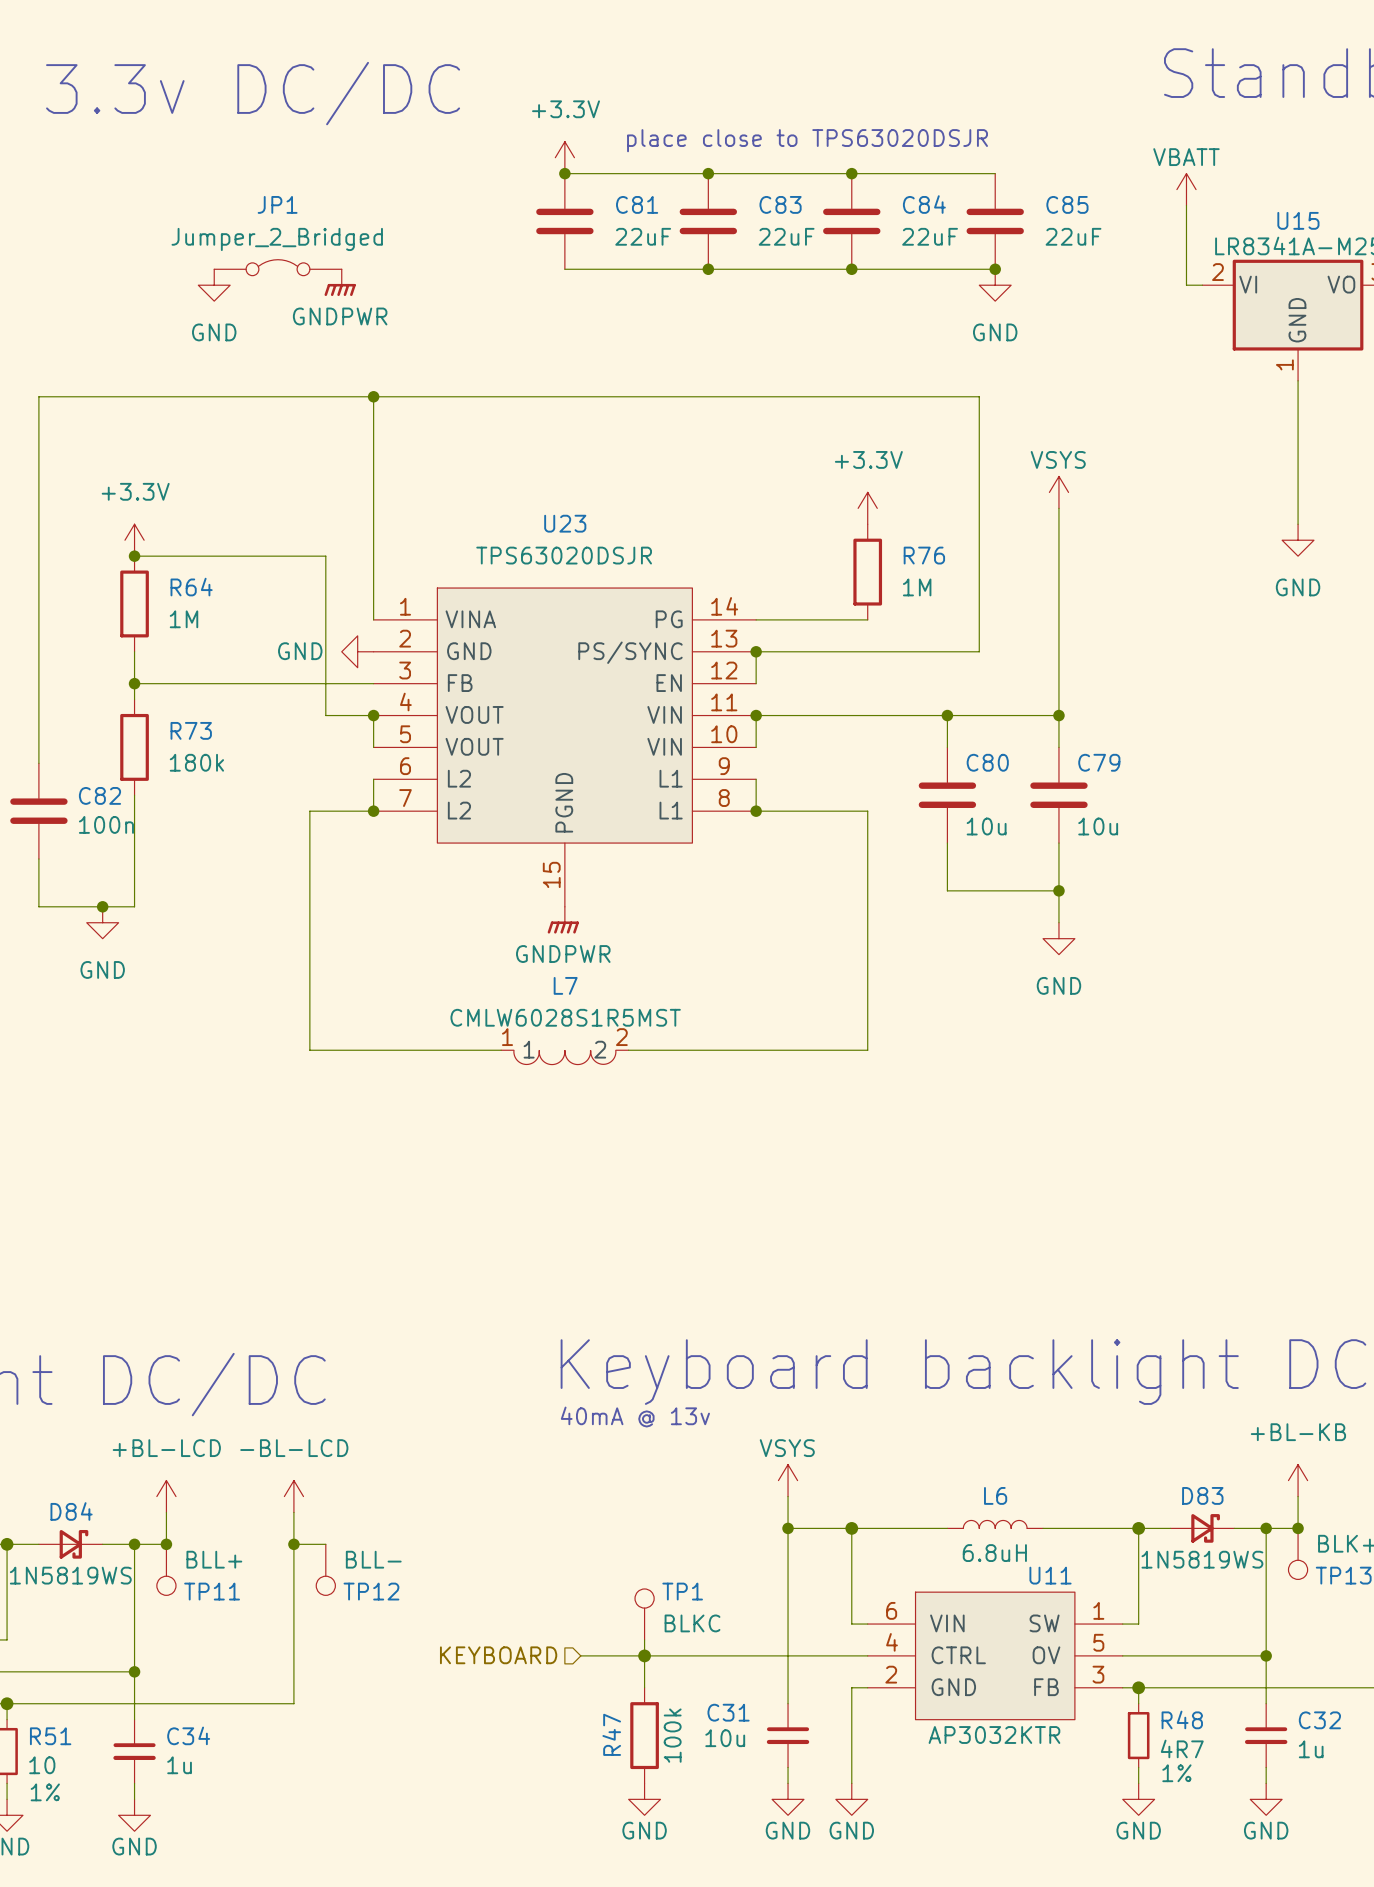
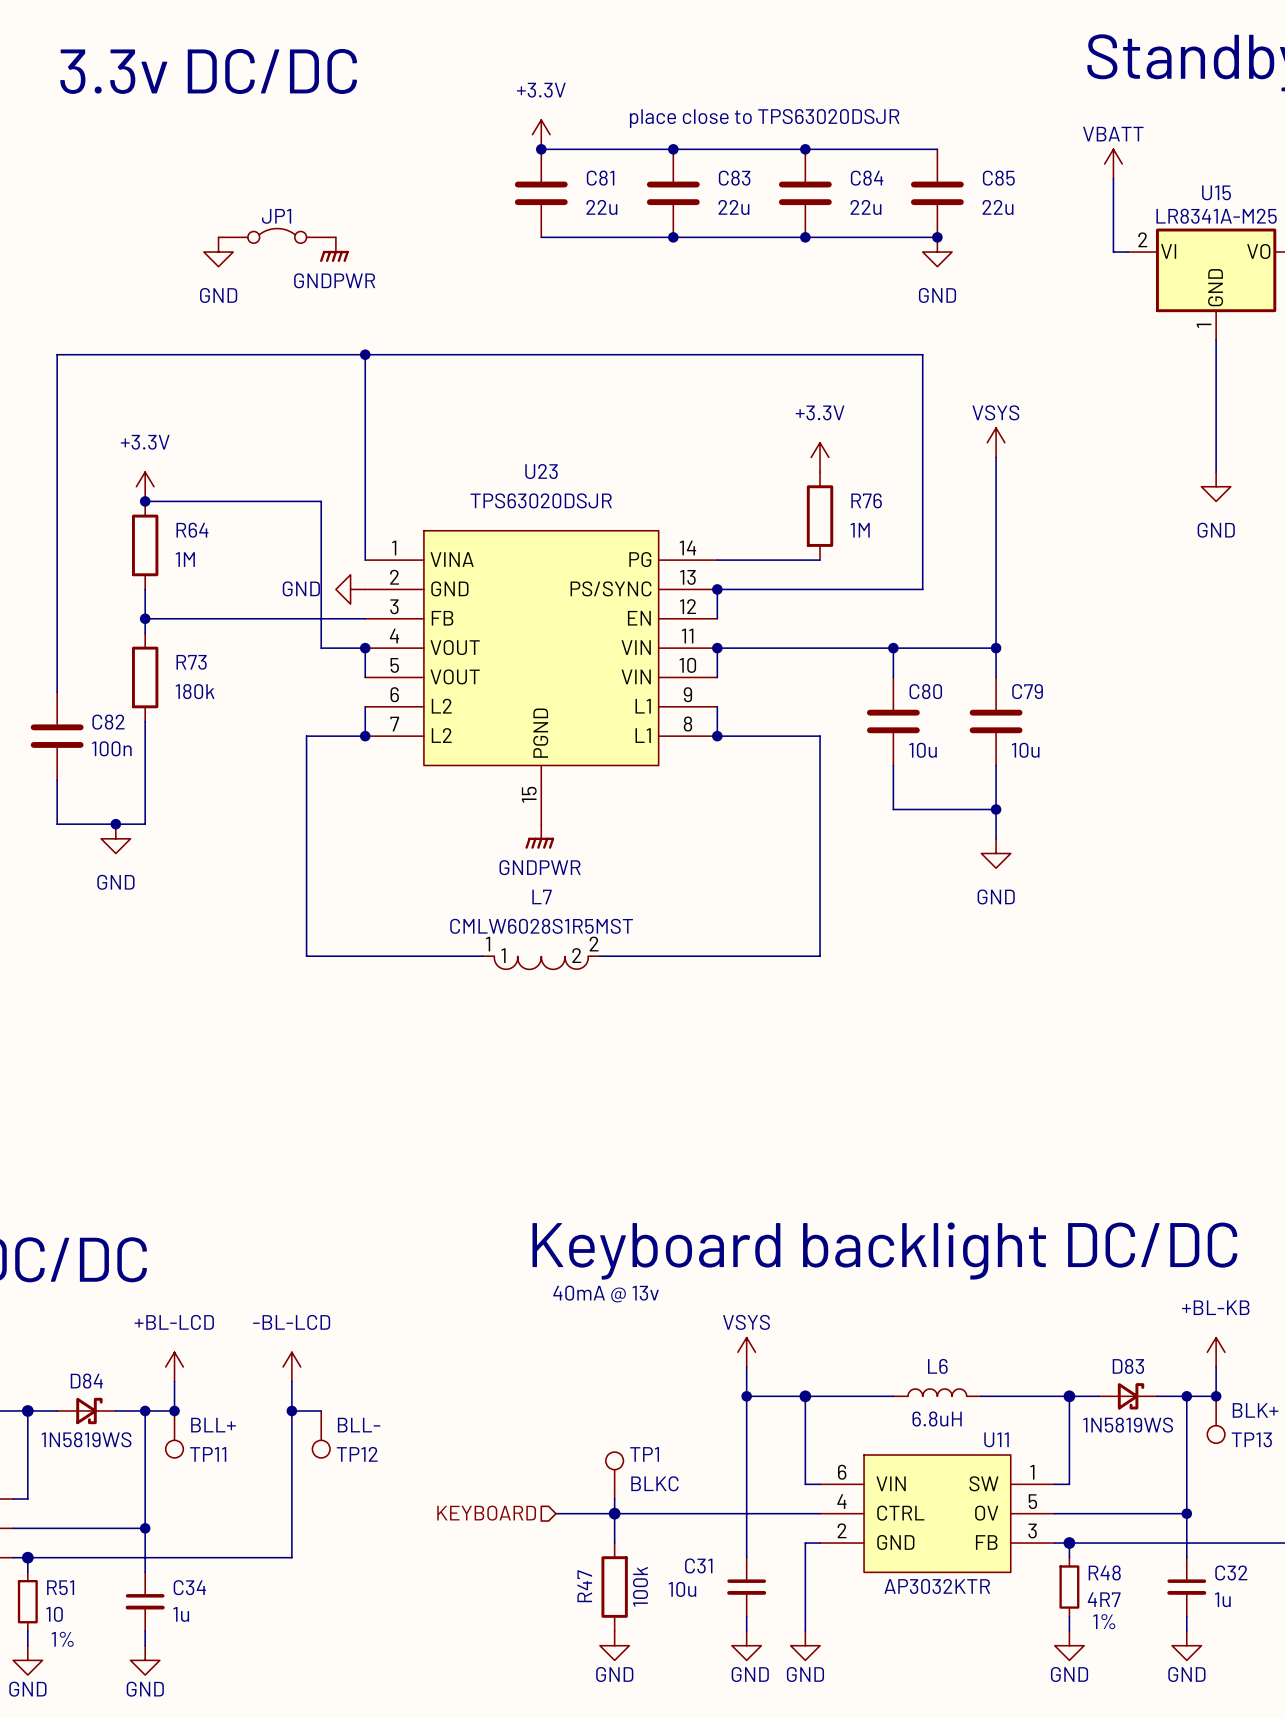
JP1 name position: JP1 (277, 204) -> JP1 (276, 216)
C81 value: 22uF (643, 236) -> 22u (601, 207)
C83 value: 22uF (786, 236) -> 22u (733, 207)
C84 value: 22uF (930, 236) -> 22u (865, 207)
C85 value: 22uF (1073, 236) -> 22u (998, 207)
JP1 value: Jumper_2_Bridged (277, 239) -> none

